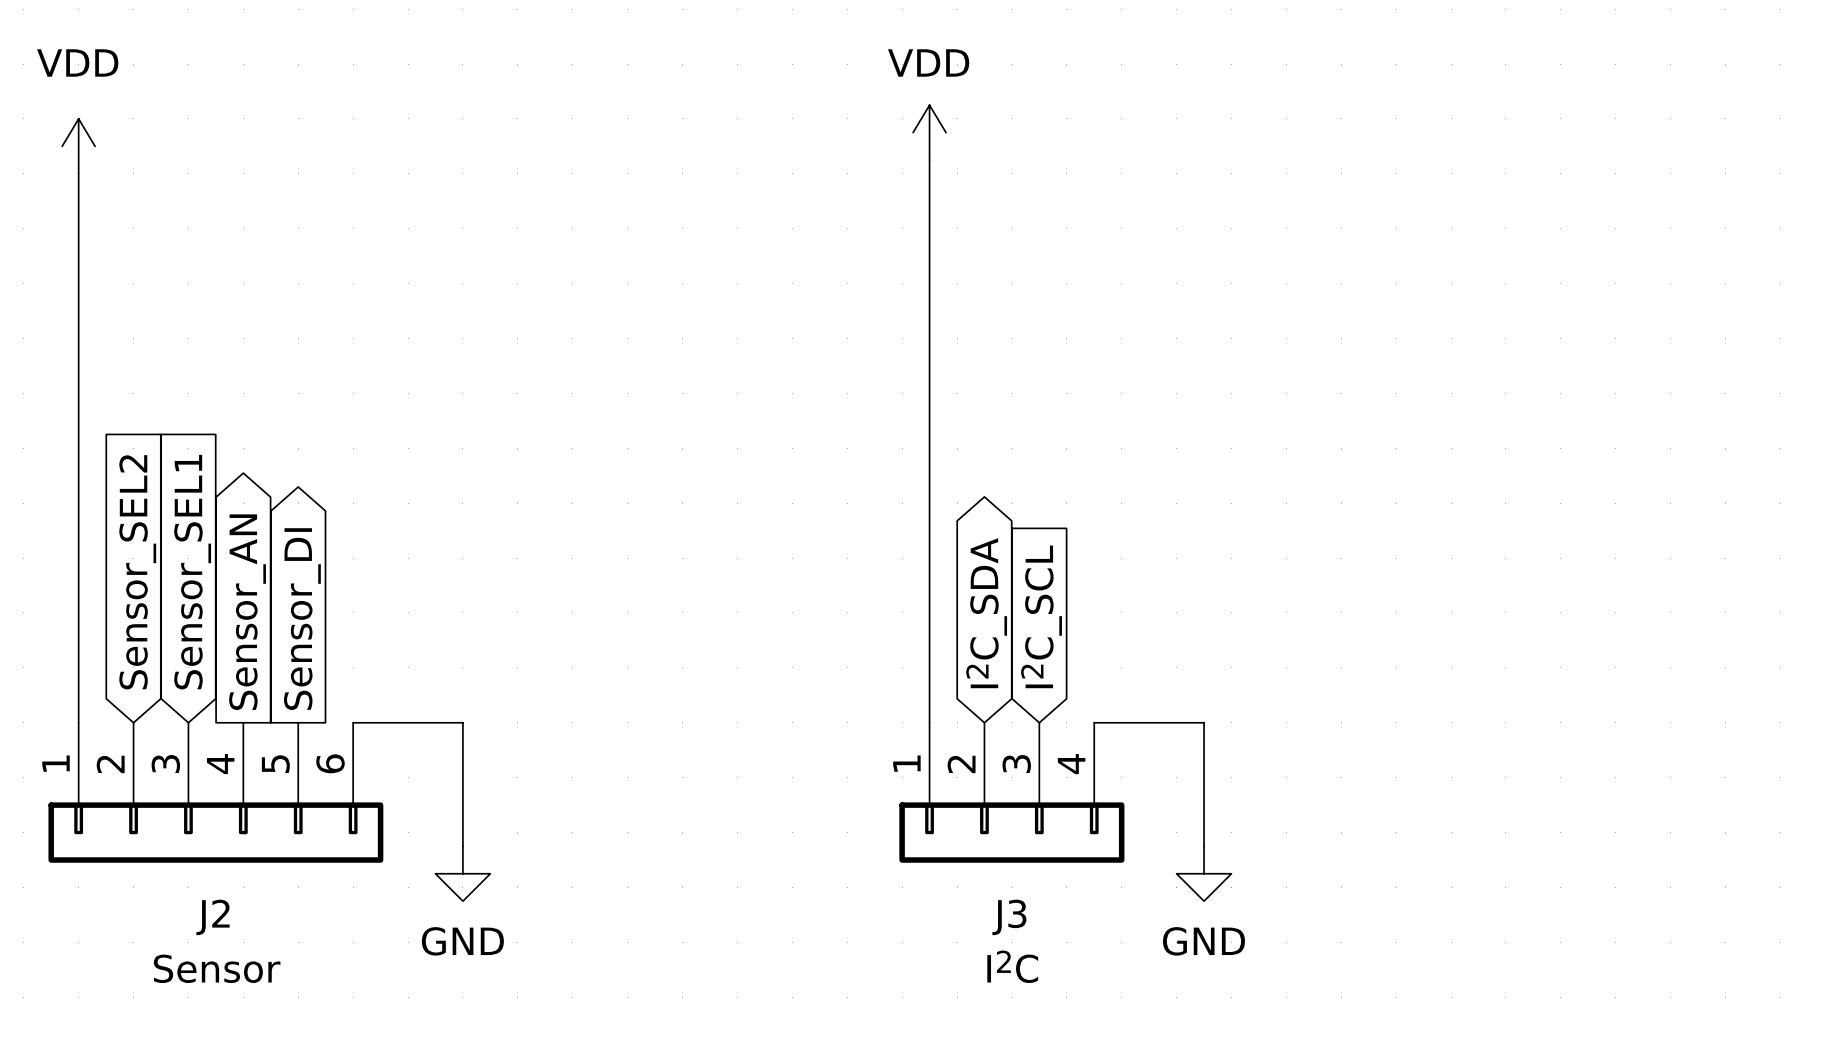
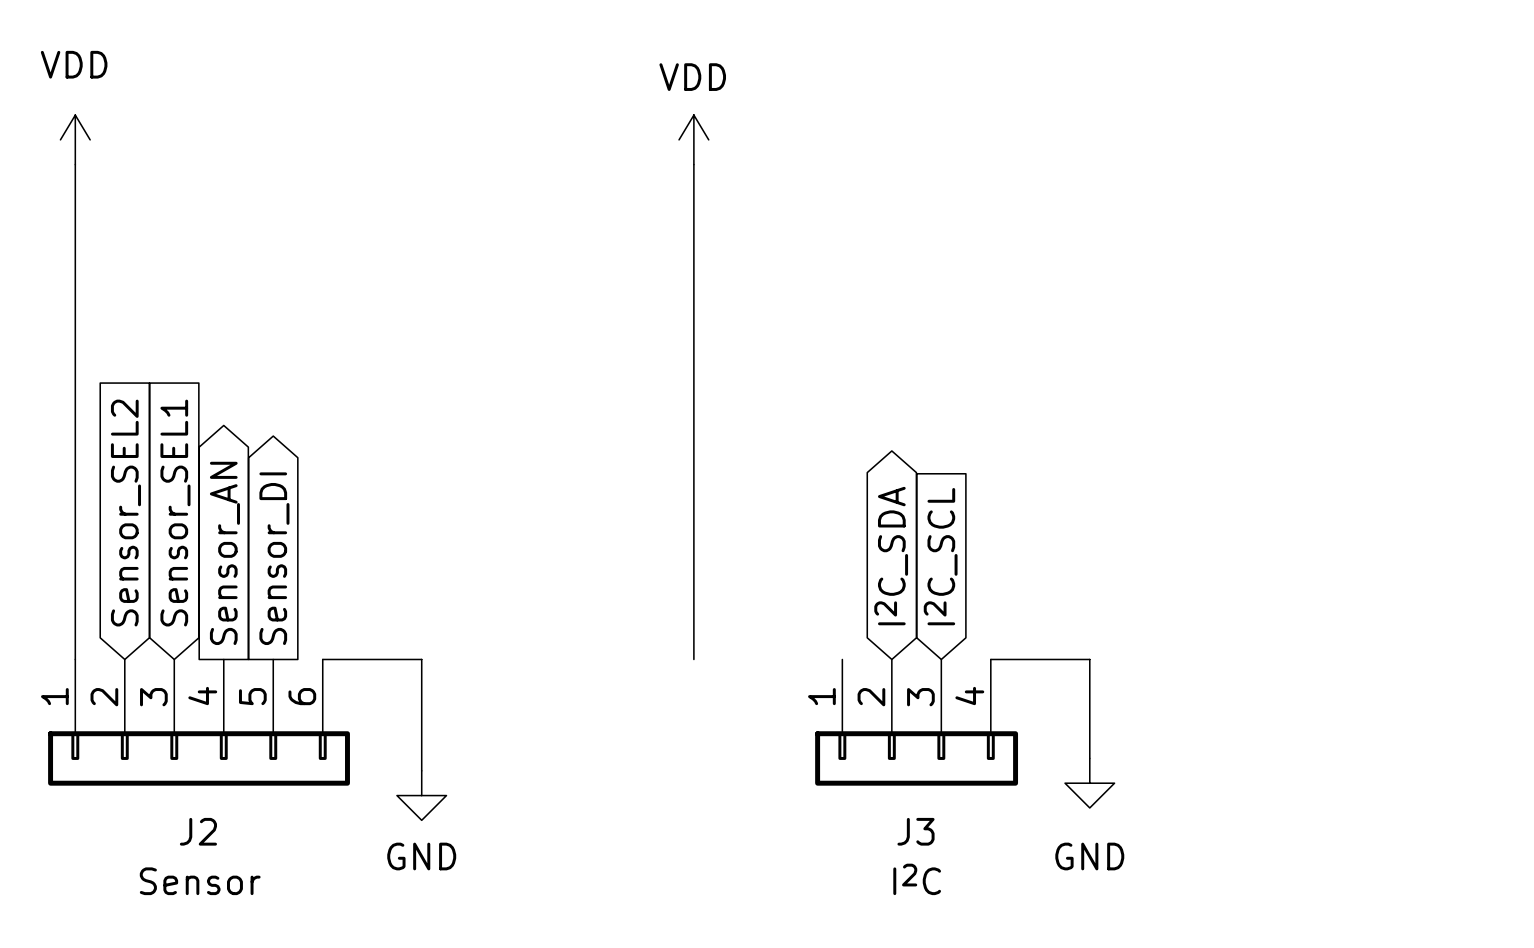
power symbol position: VDD (929, 132) -> VDD (693, 139)
wire: (929, 160) (929, 722) -> none
wire: none -> (693, 164) (693, 659)
power symbol position: GND (1204, 873) -> GND (1089, 783)

